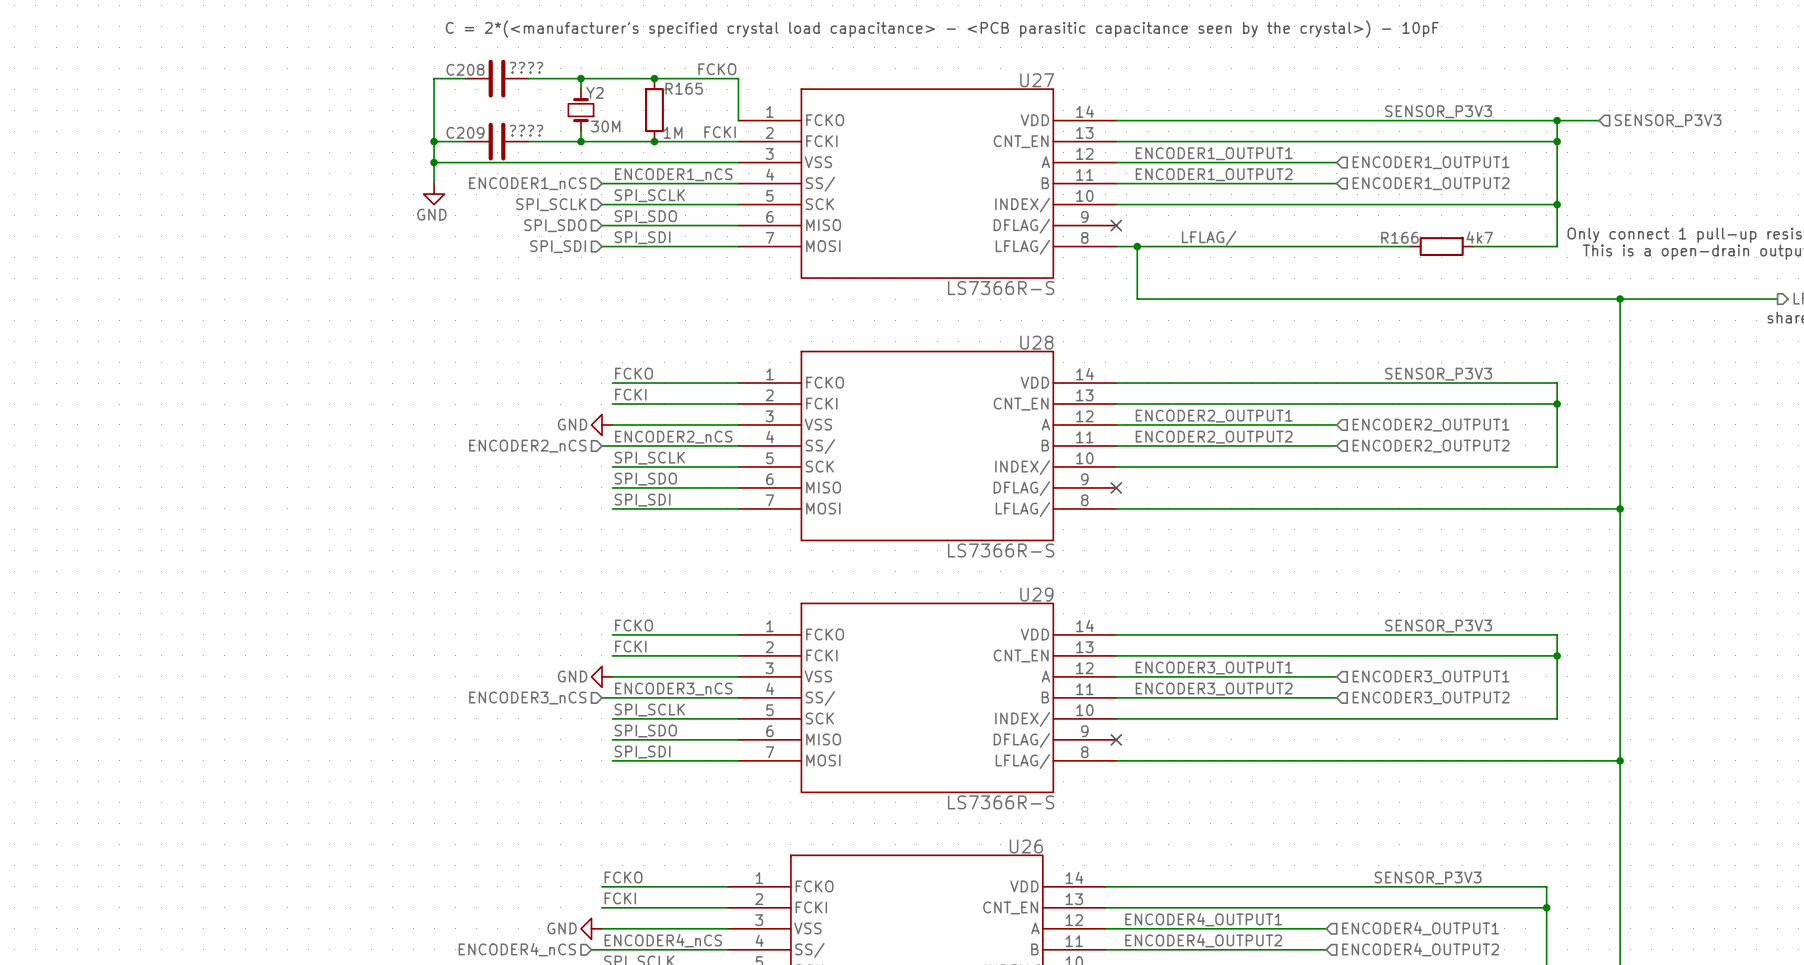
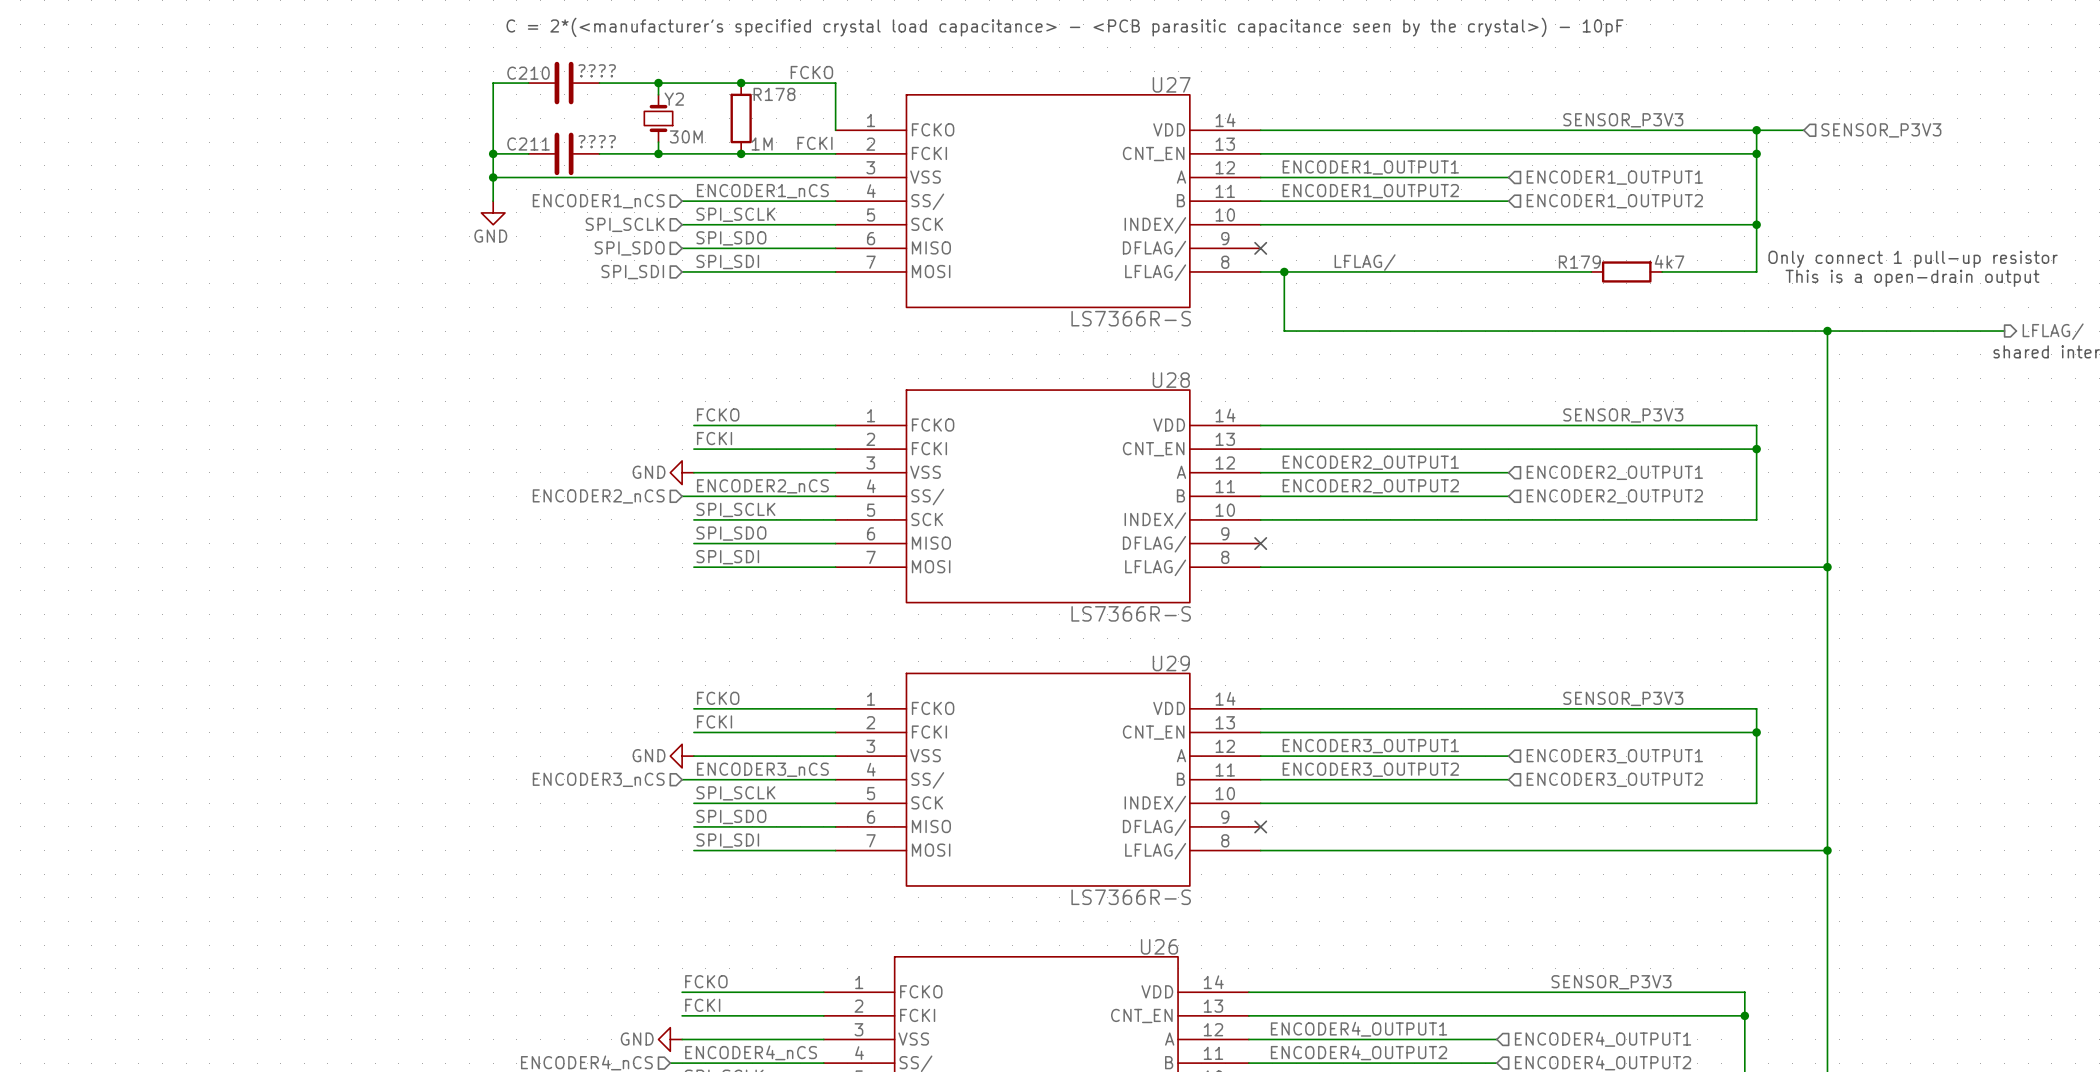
C208 name: C208 (465, 69) -> C210 (528, 73)
R165 name: R165 (684, 88) -> R178 (774, 94)
C209 name: C209 (465, 132) -> C211 (528, 144)
R166 name: R166 (1399, 237) -> R179 (1579, 262)

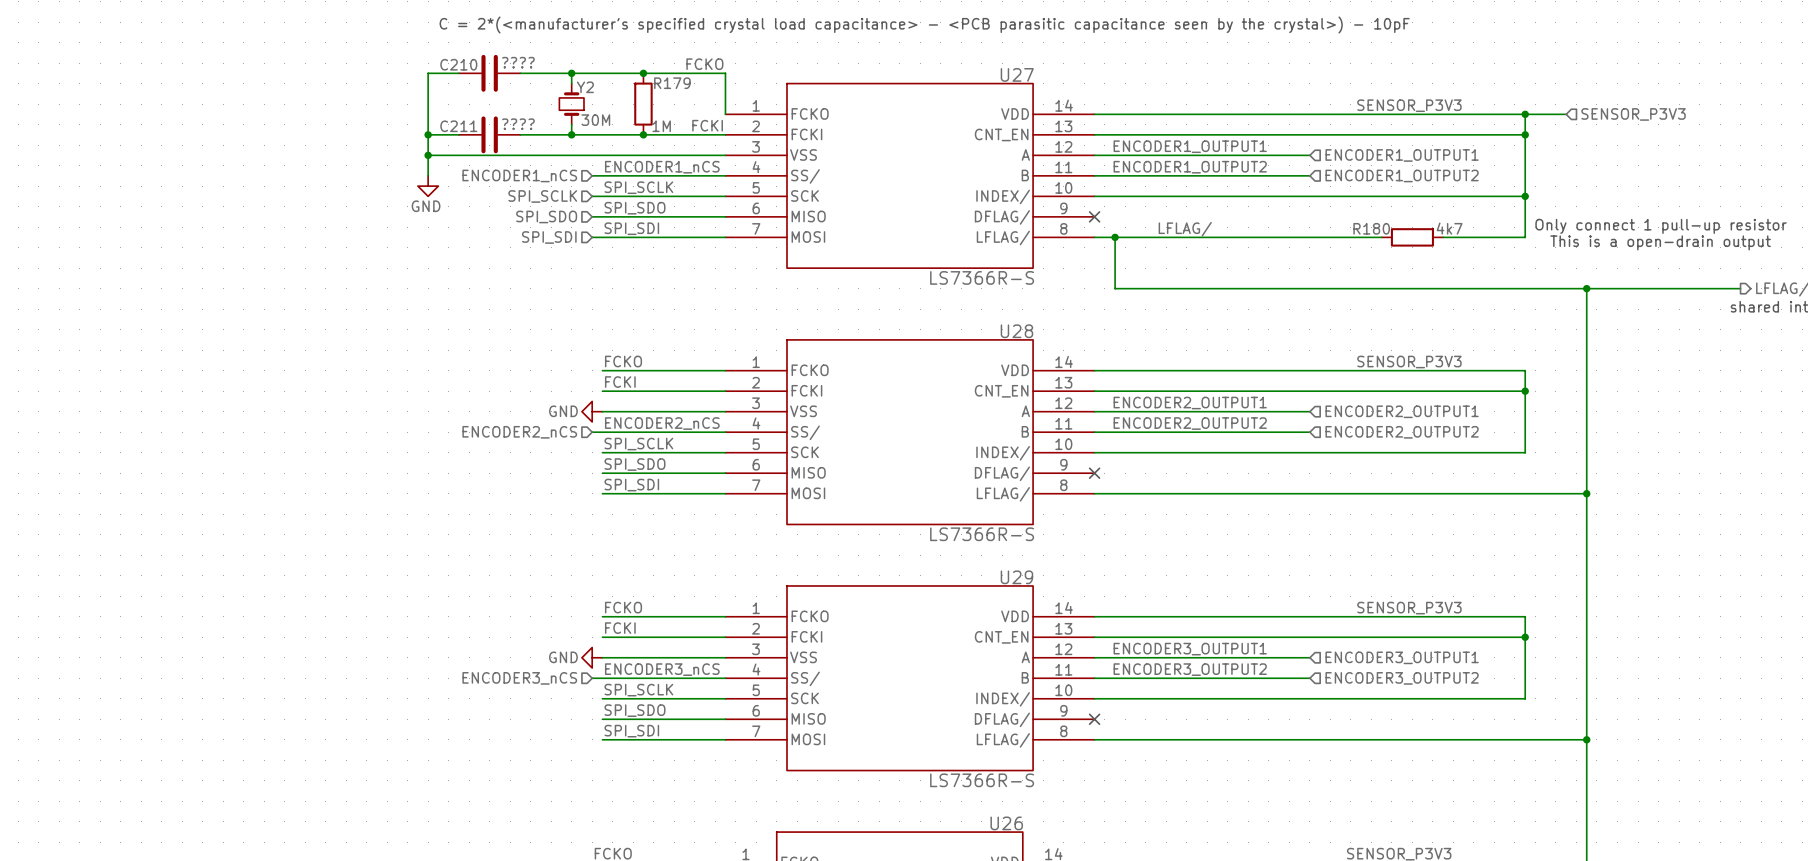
R178 name: R178 (774, 94) -> R179 (672, 83)
R179 name: R179 (1579, 262) -> R180 (1371, 228)

